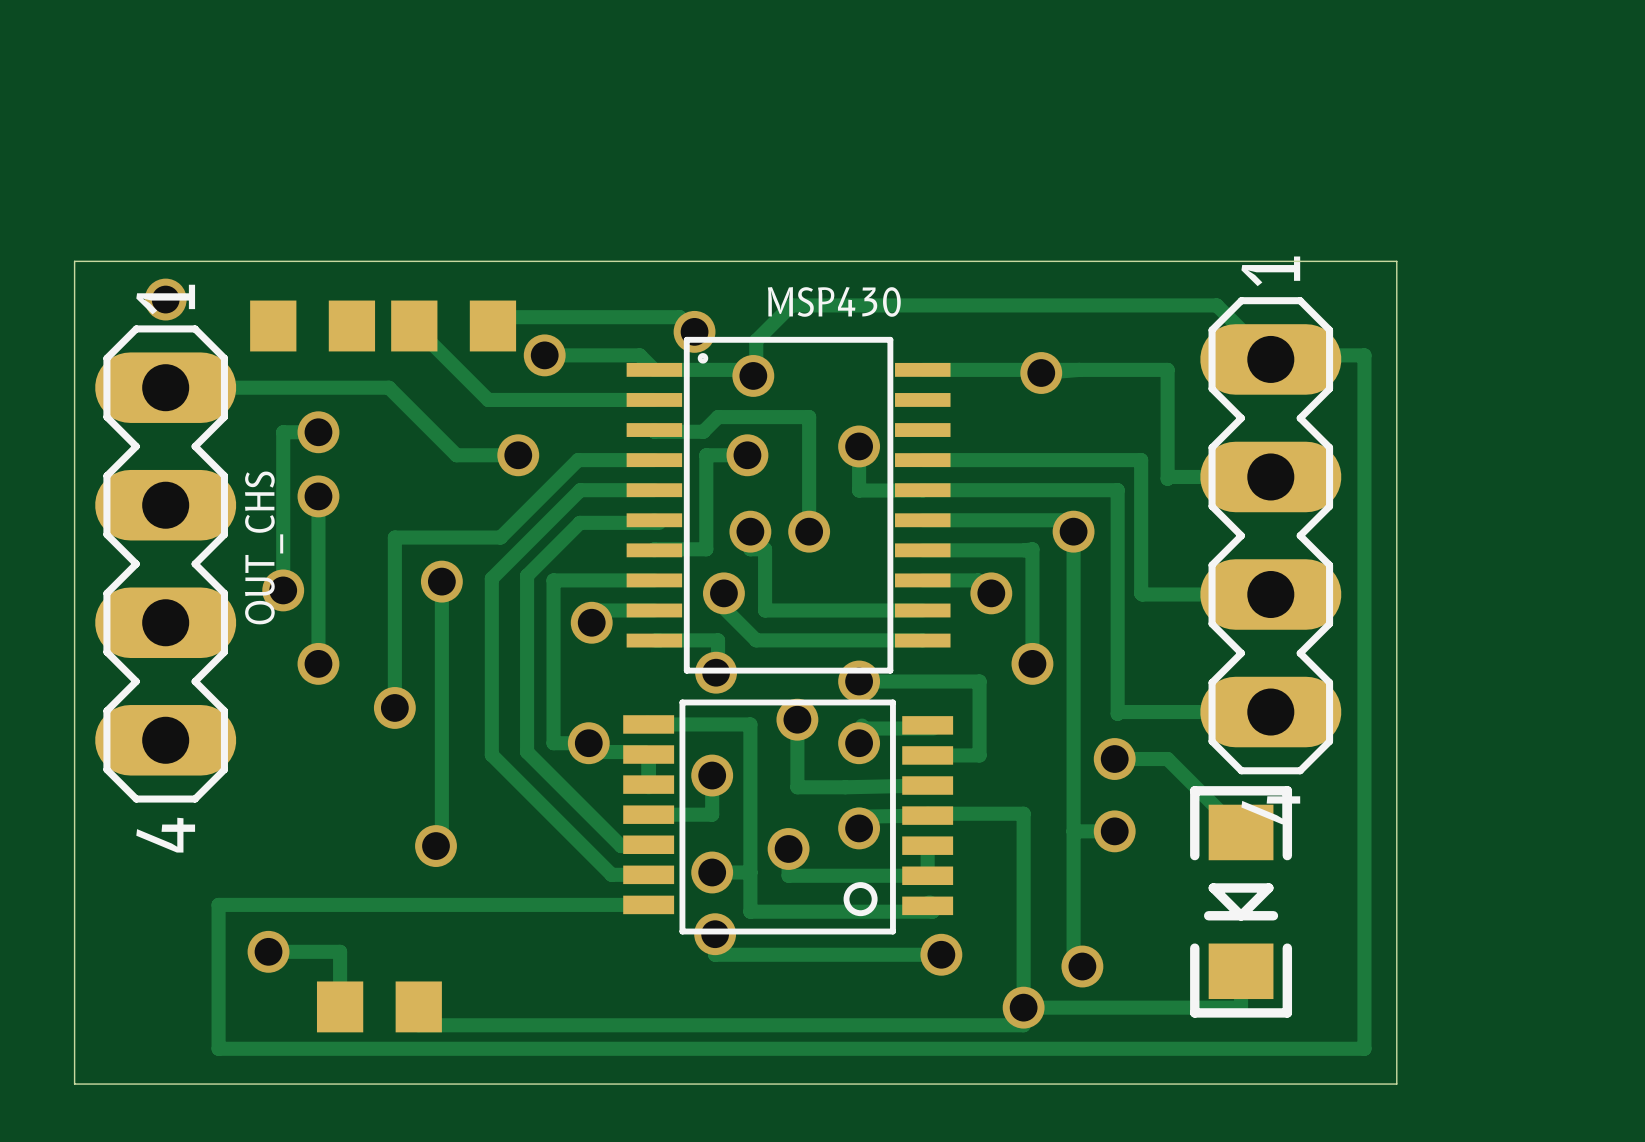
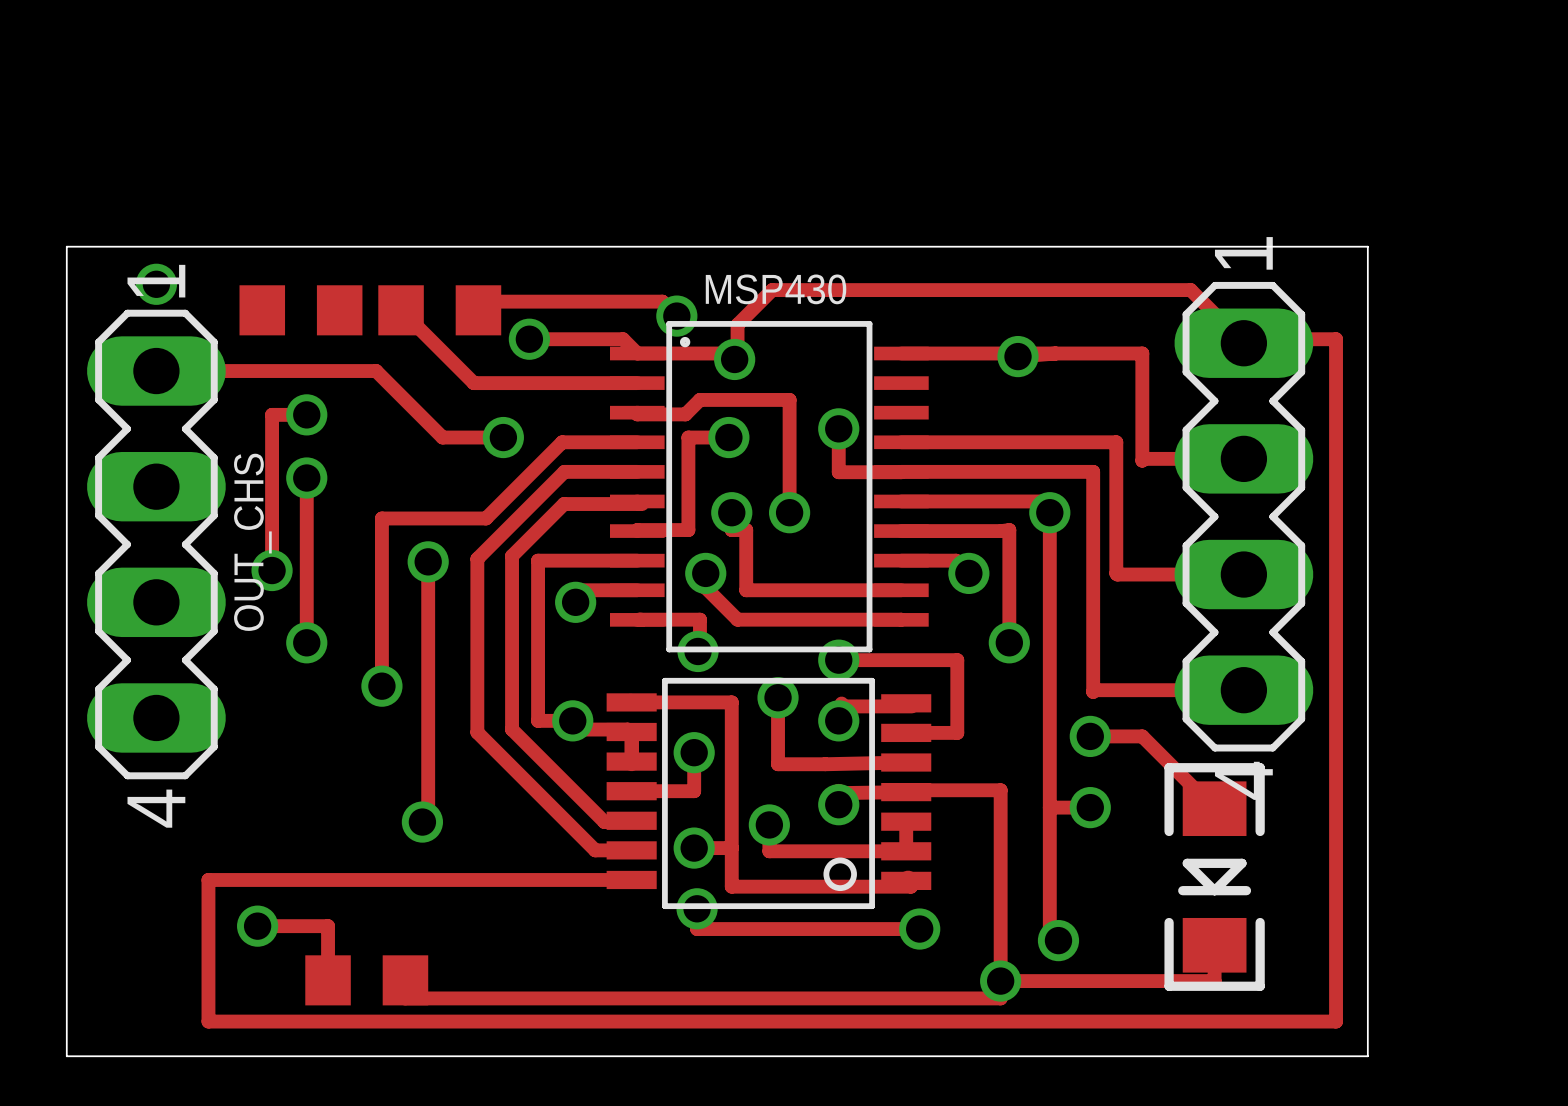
MSP430 name position: MSP430 (834, 301) -> MSP430 (776, 289)

